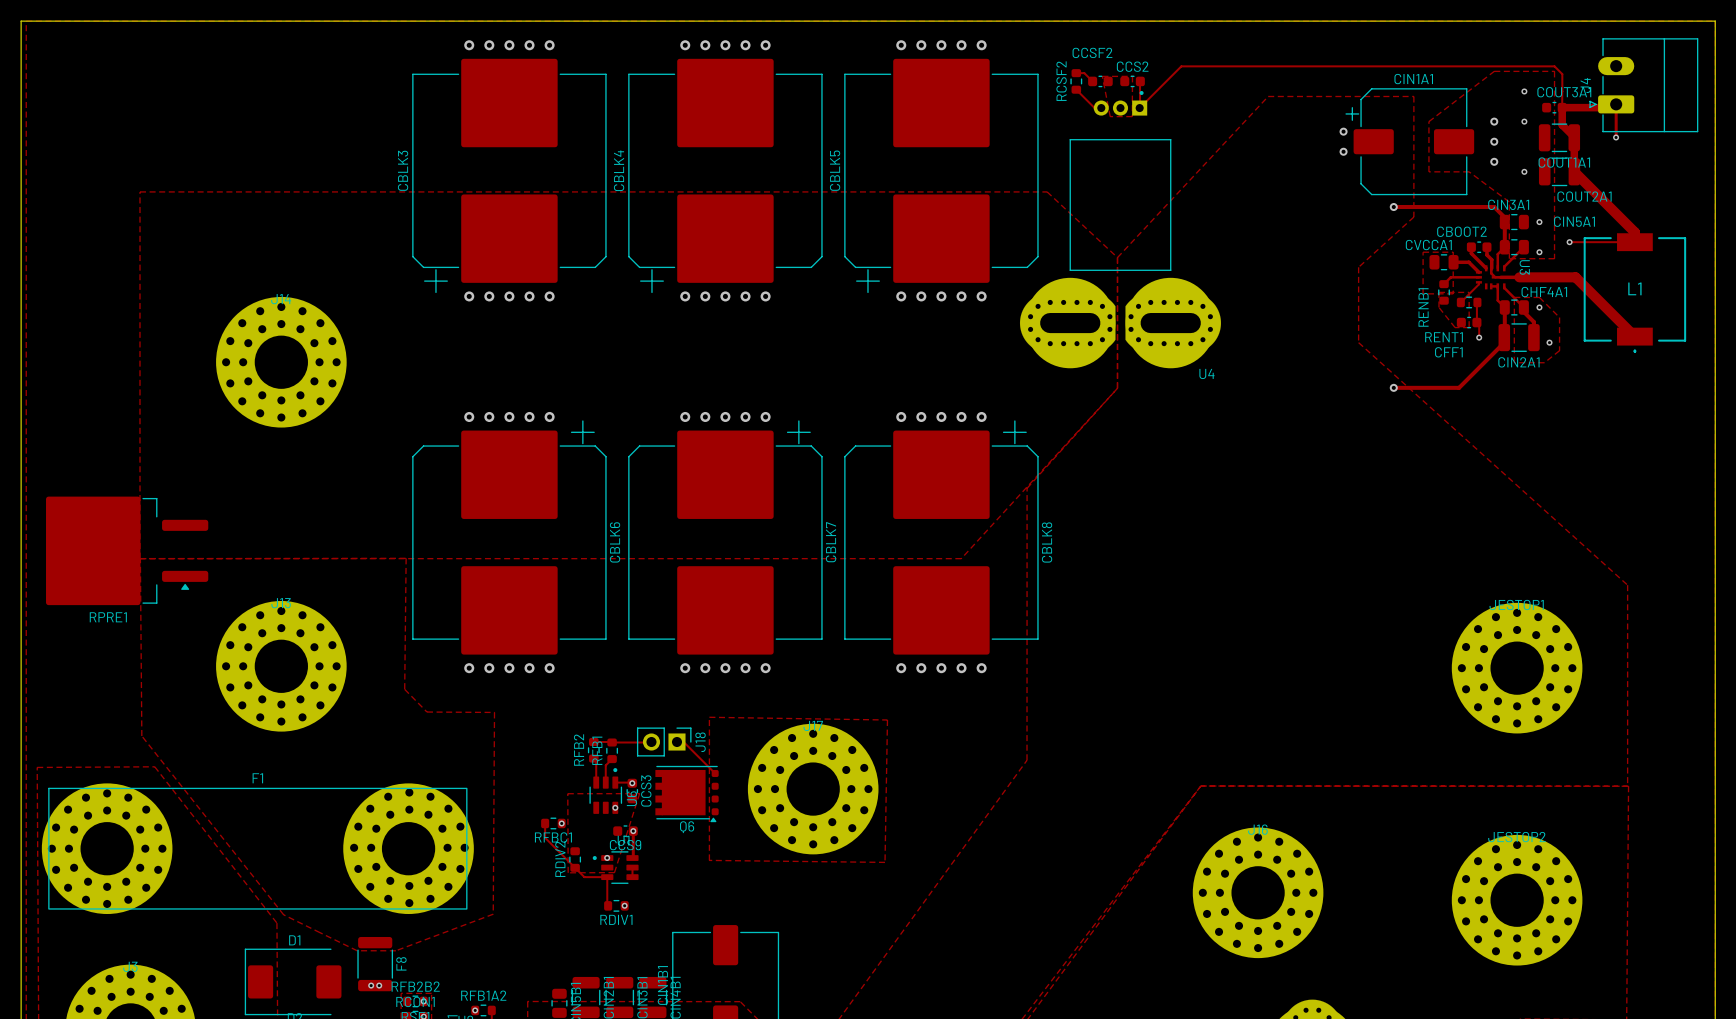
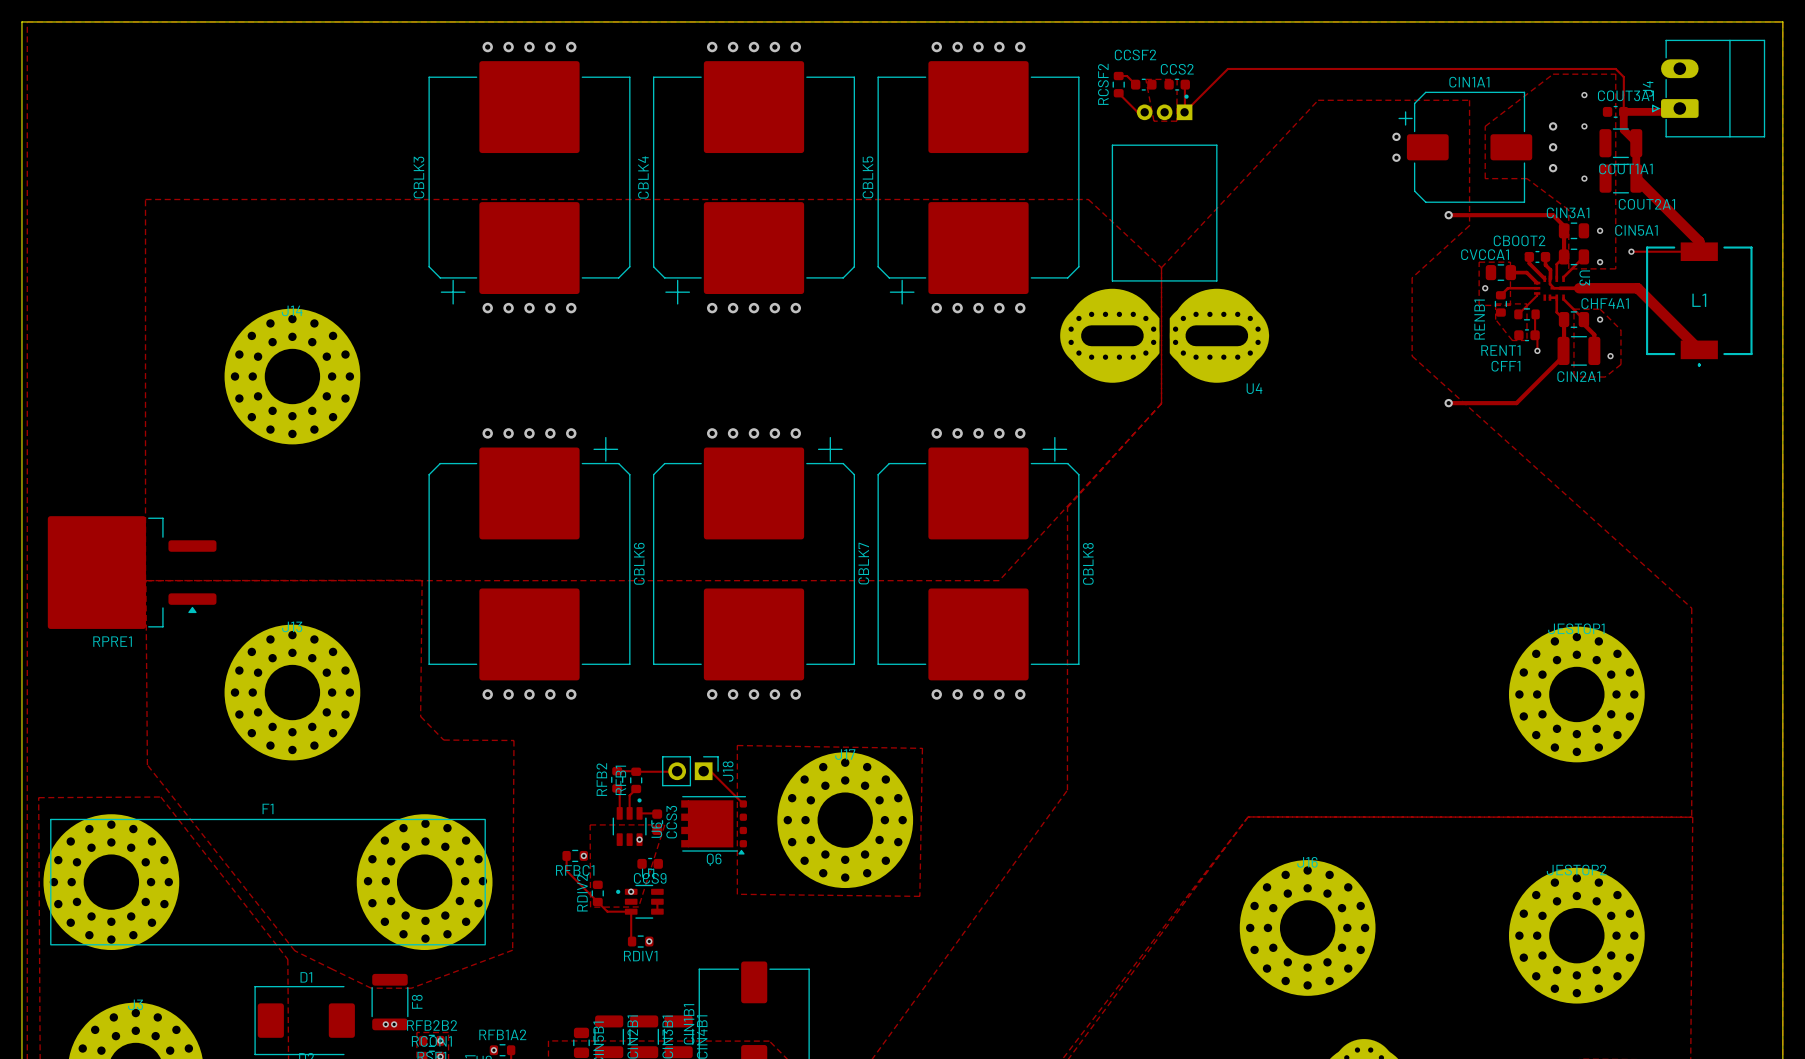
track: (1616, 104) (1616, 137) -> none
via: (1616, 137) -> none
via: none -> (1485, 288)
via: (632, 783) -> none
track: (633, 831) (632, 858) -> none
via: (633, 831) -> none

